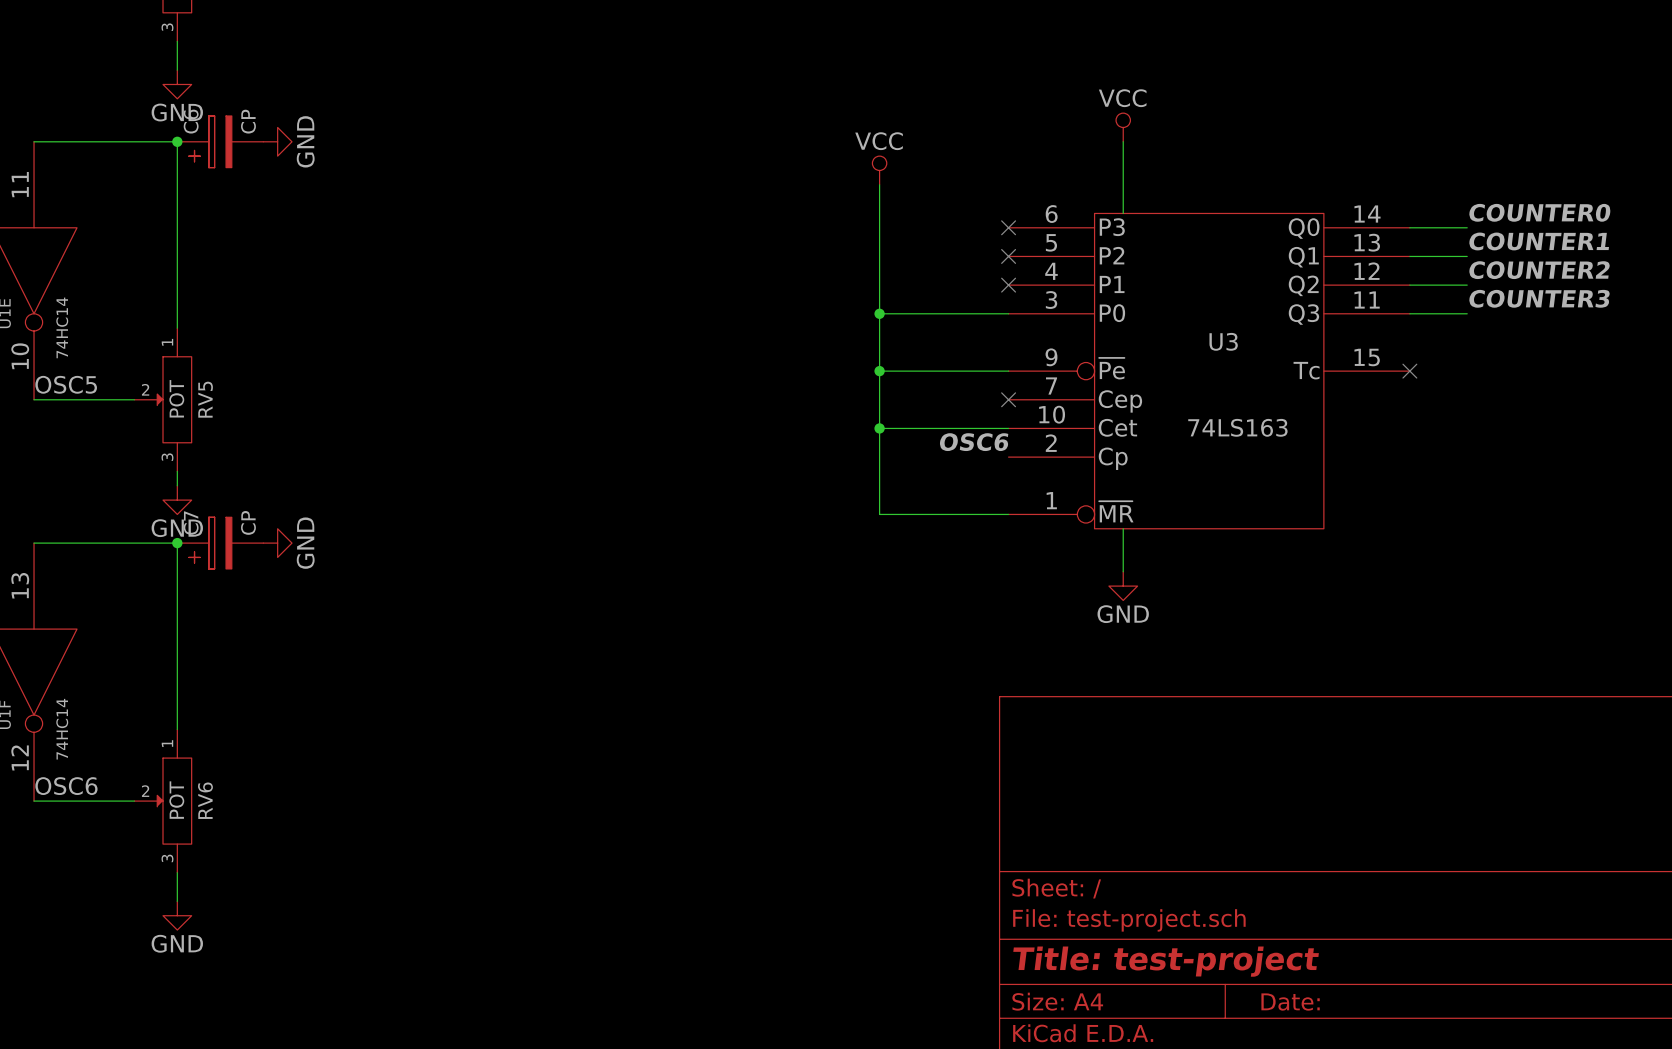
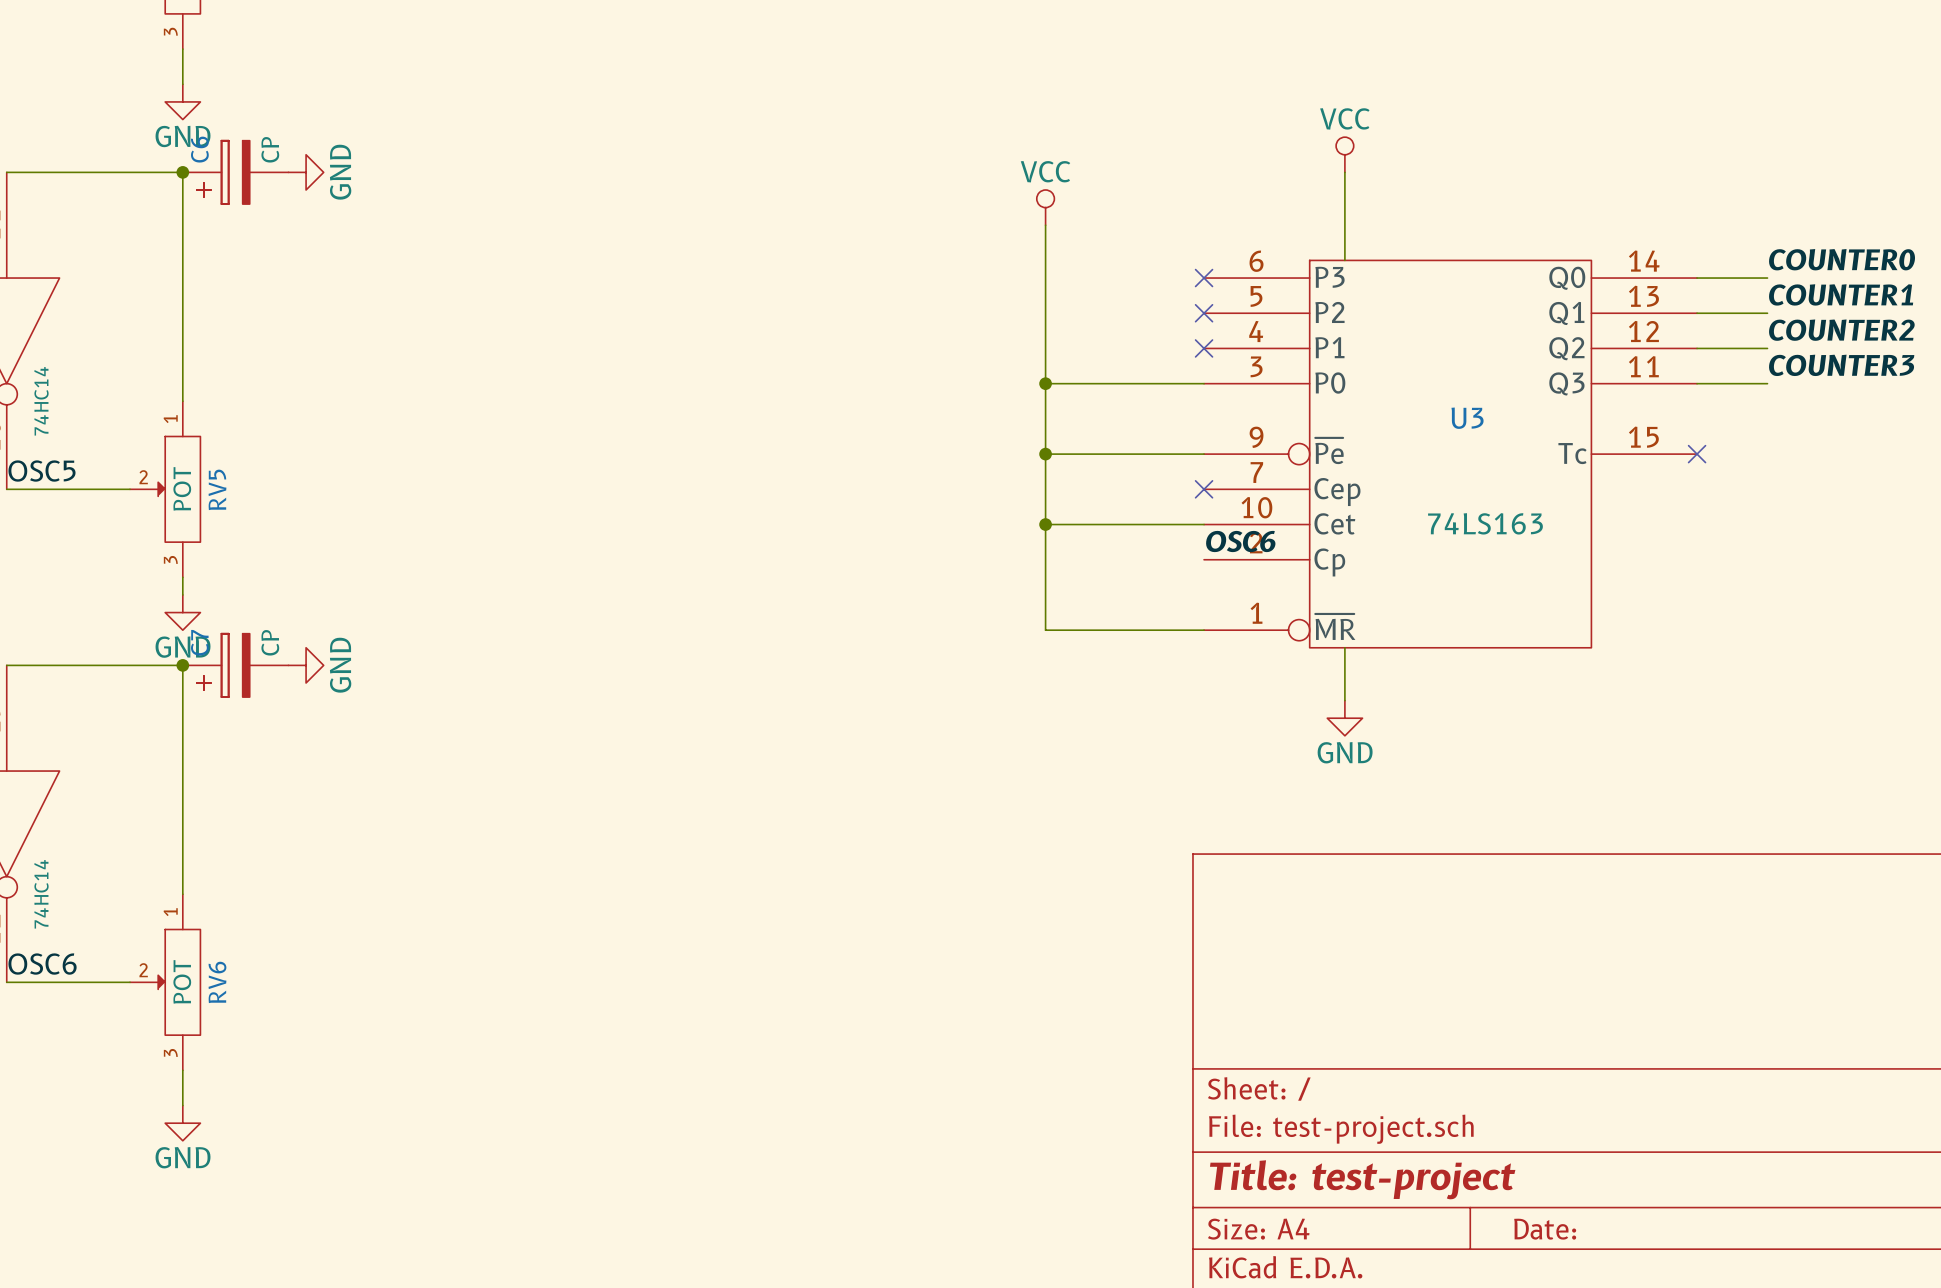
label position: OSC6 (973, 442) -> OSC6 (1240, 541)

